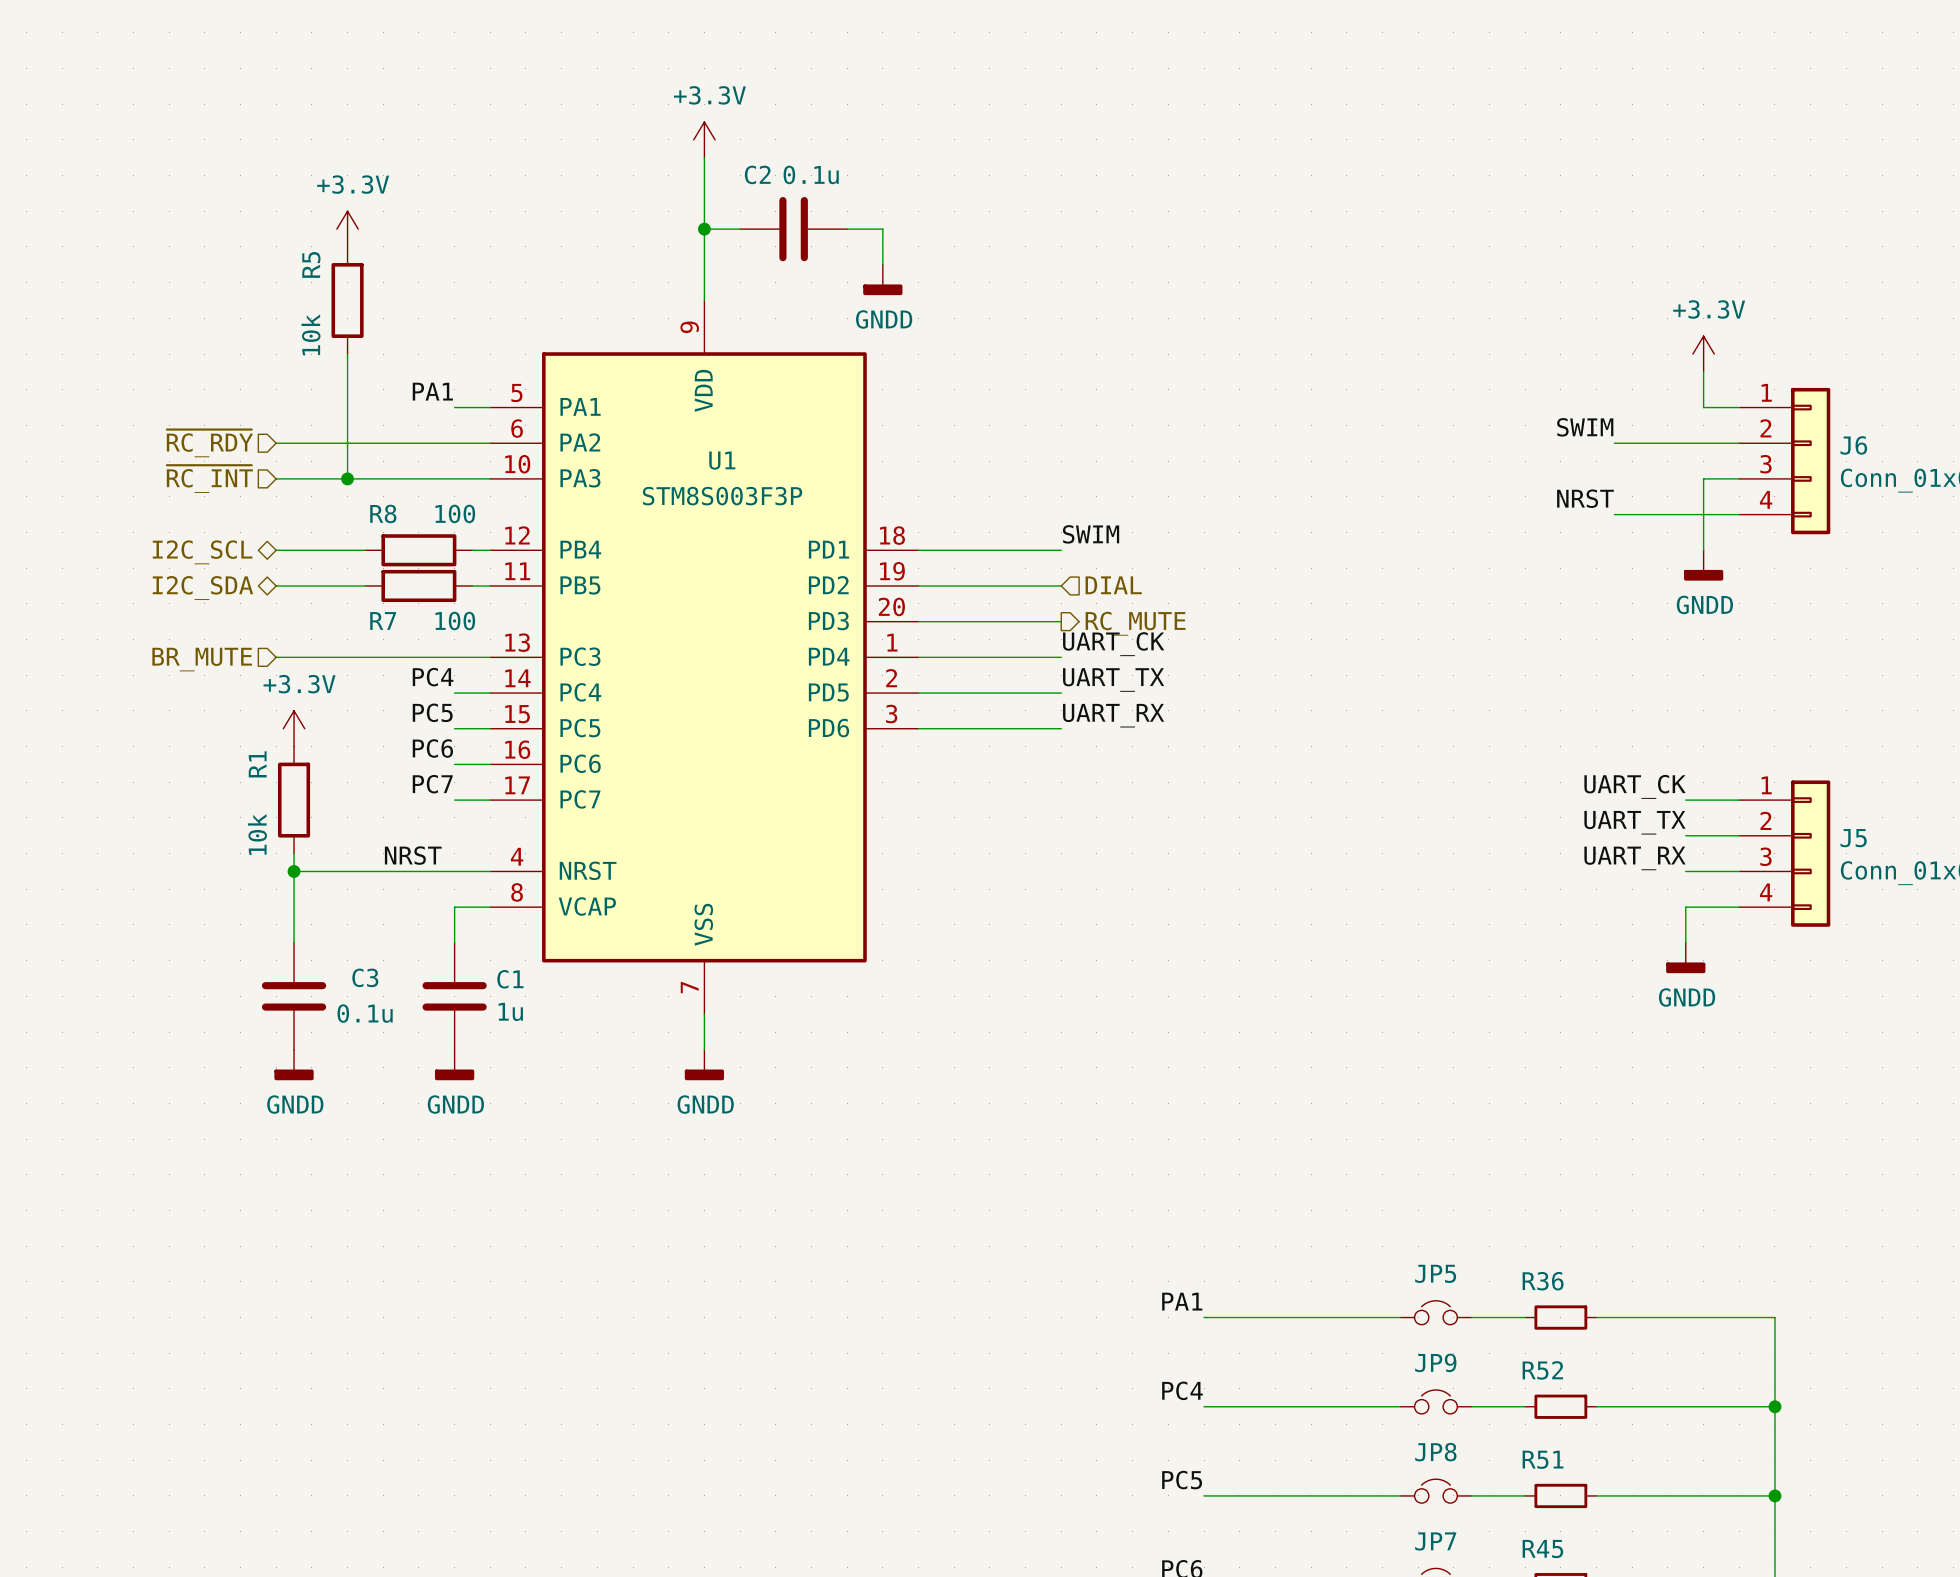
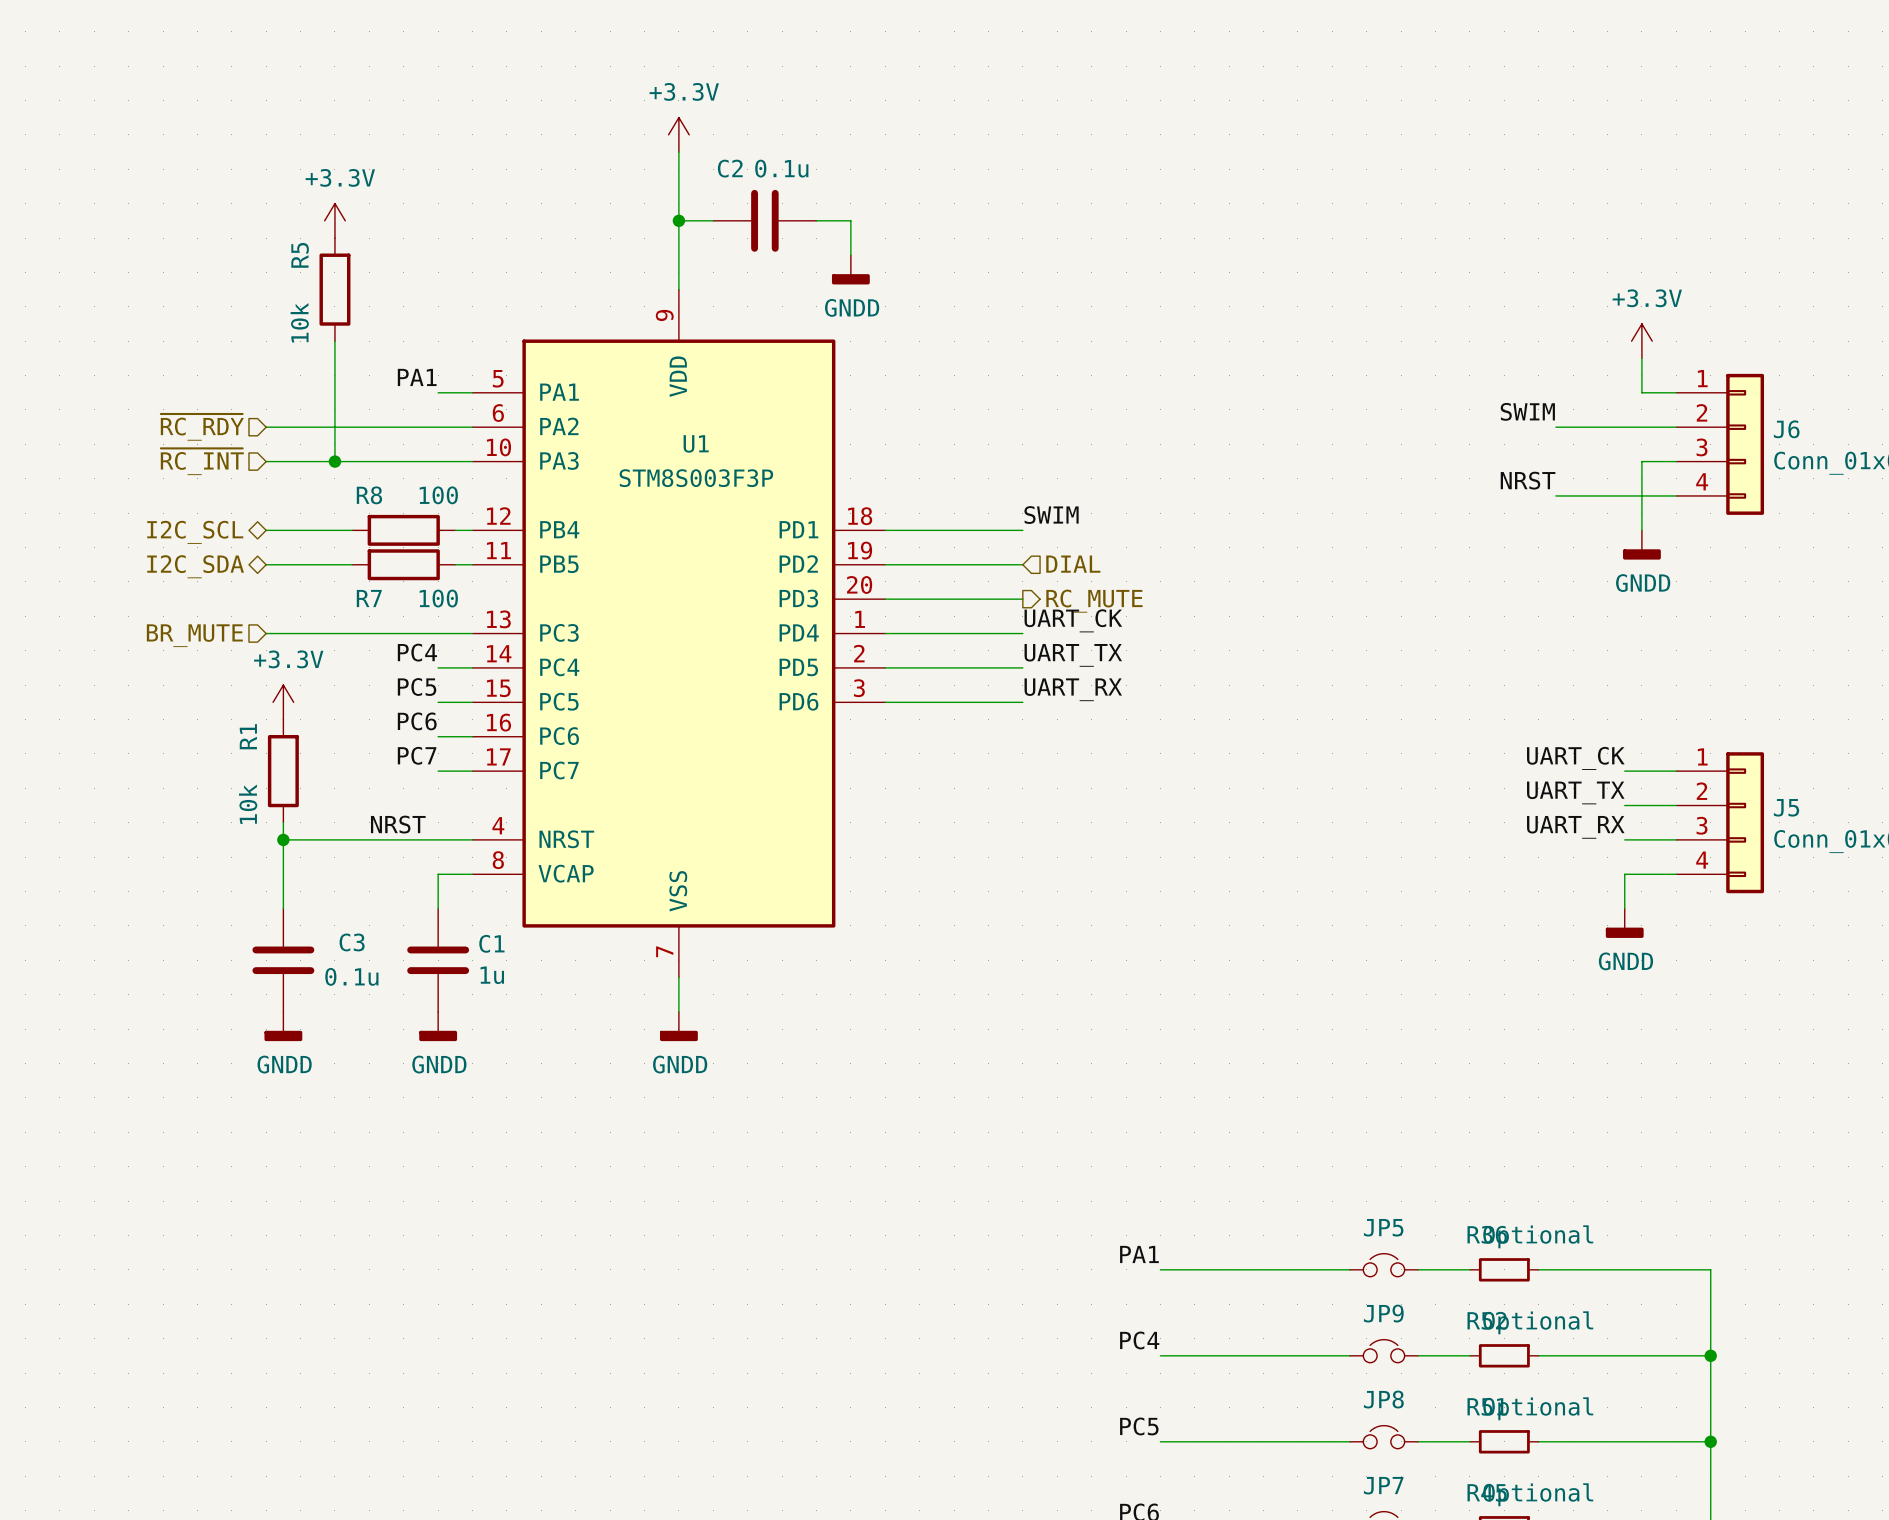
R36 value: none -> Optional (1538, 1236)
R52 value: none -> Optional (1538, 1322)
R51 value: none -> Optional (1538, 1408)
R45 value: none -> Optional (1538, 1494)

